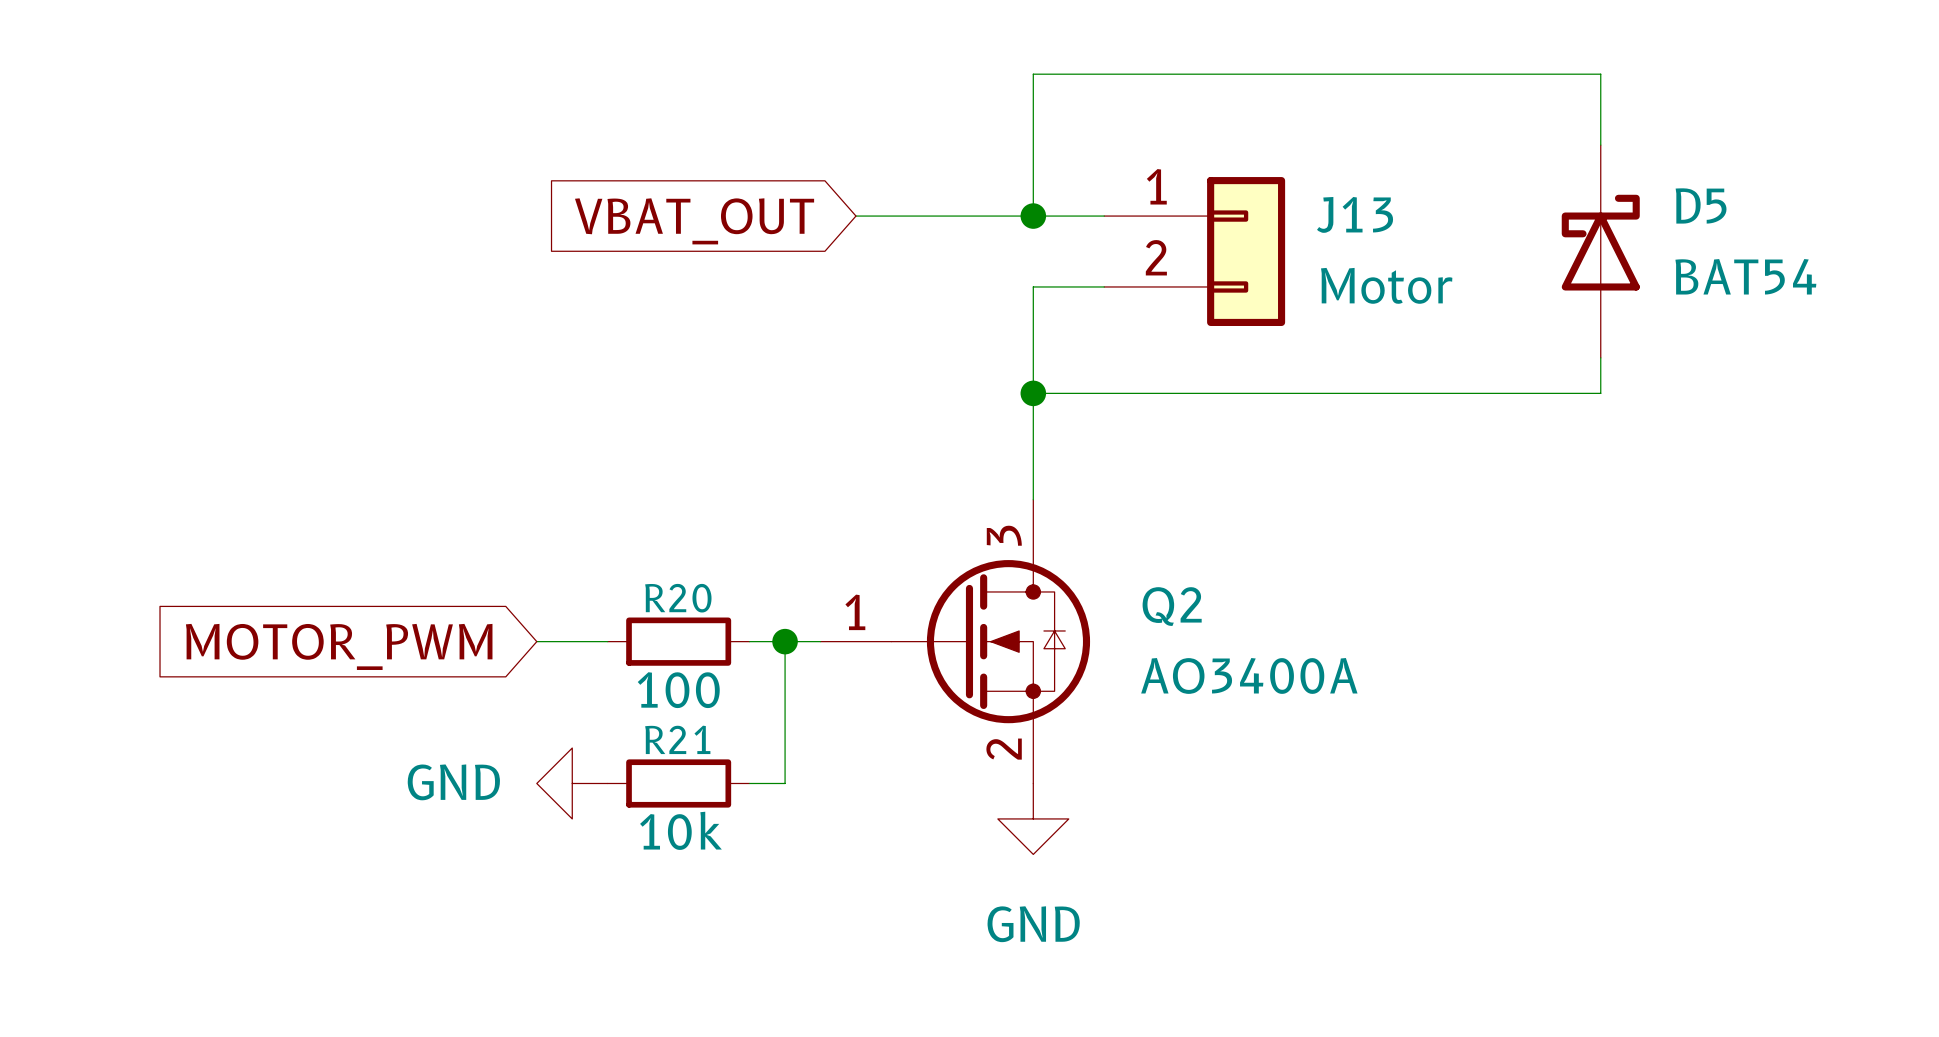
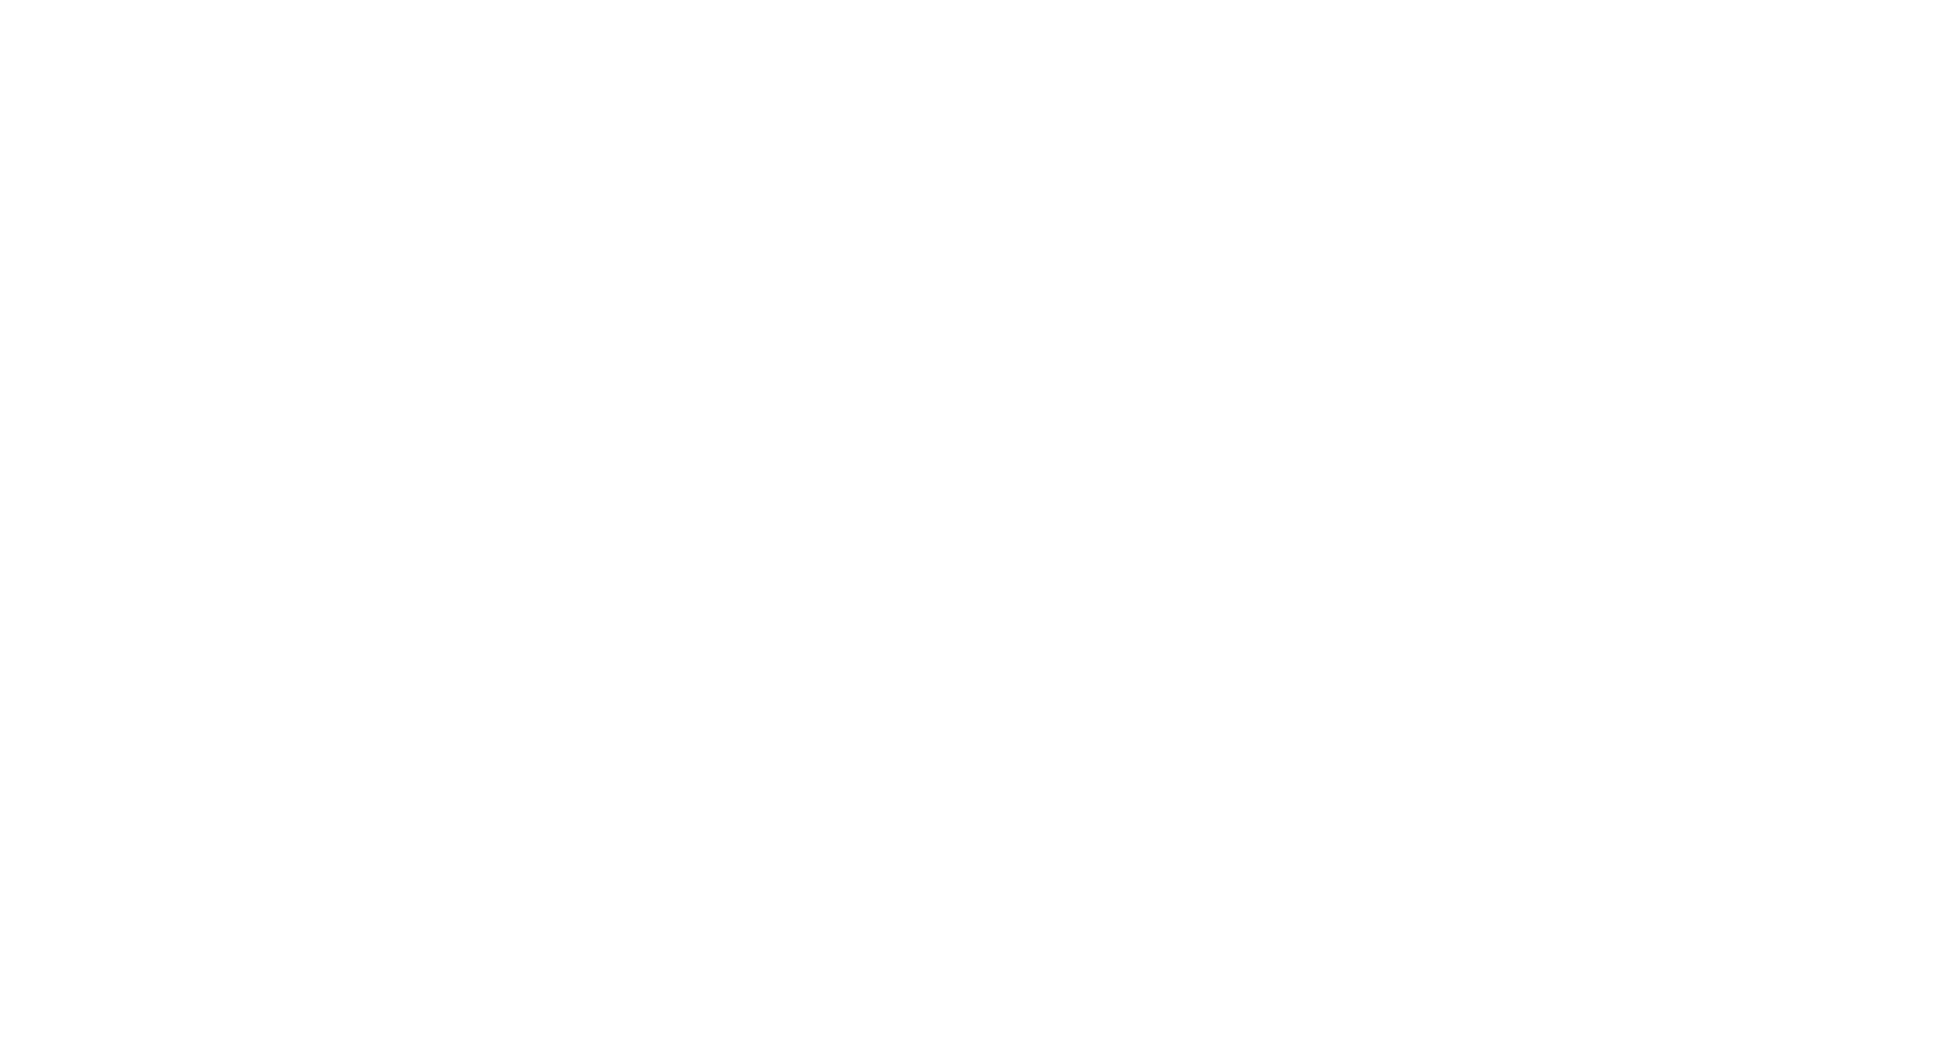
wire: (1600, 145) (1600, 74) (1033, 74) (1033, 216) -> none
wire: (855, 216) (1104, 216) -> none
junction: (1033, 216) -> none
global label: VBAT_OUT (694, 221) -> none
J13: Motor (1194, 251) -> none
D5: BAT54 (1600, 251) -> none
wire: (1104, 286) (1033, 286) (1033, 499) -> none
wire: (1600, 357) (1600, 393) (1033, 393) -> none
junction: (1033, 393) -> none
wire: (536, 641) (607, 641) -> none
R20: 100 (678, 641) -> none
wire: (749, 641) (820, 641) -> none
wire: (785, 641) (785, 783) (749, 783) -> none
junction: (785, 641) -> none
Q2: AO3400A (955, 641) -> none
global label: MOTOR_PWM (339, 646) -> none
power symbol: GND (572, 783) -> none
R21: 10k (678, 783) -> none
power symbol: GND (1033, 818) -> none

